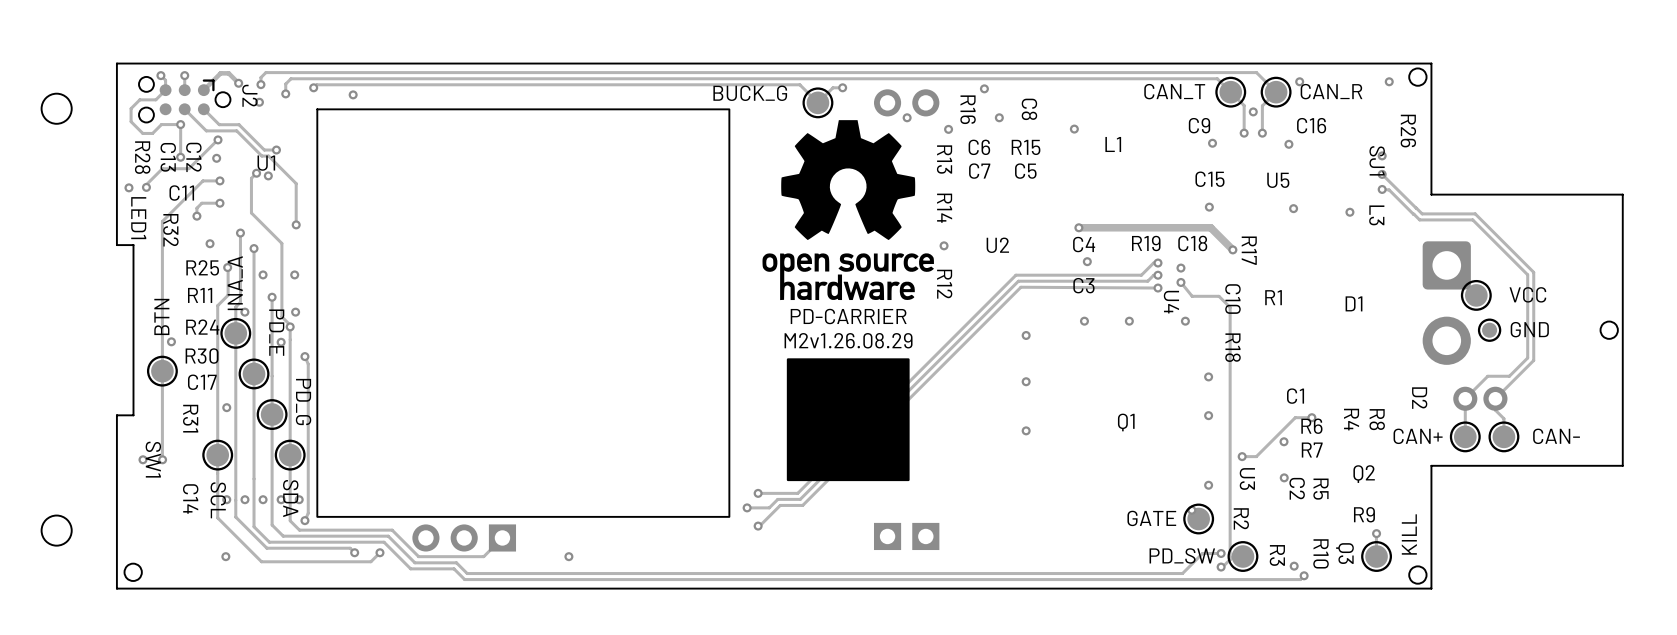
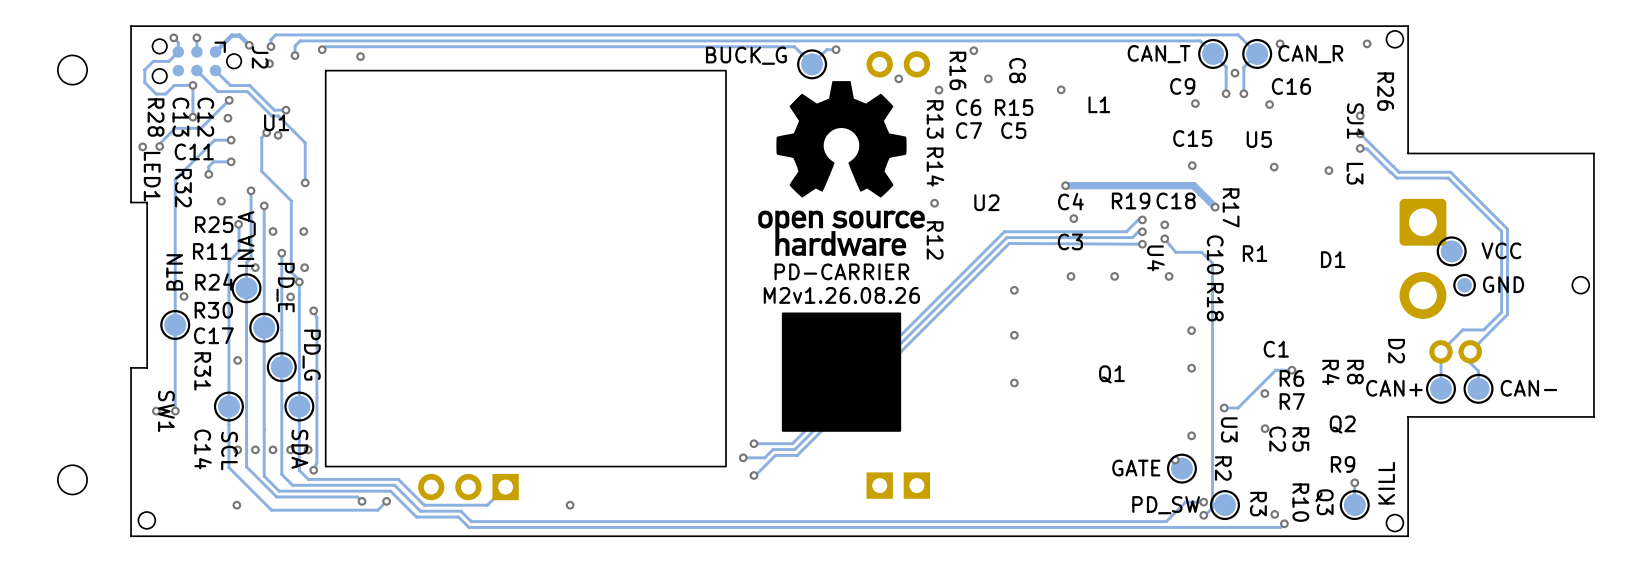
text: M2v1.26.08.29 (848, 340) -> M2v1.26.08.26 (841, 295)

